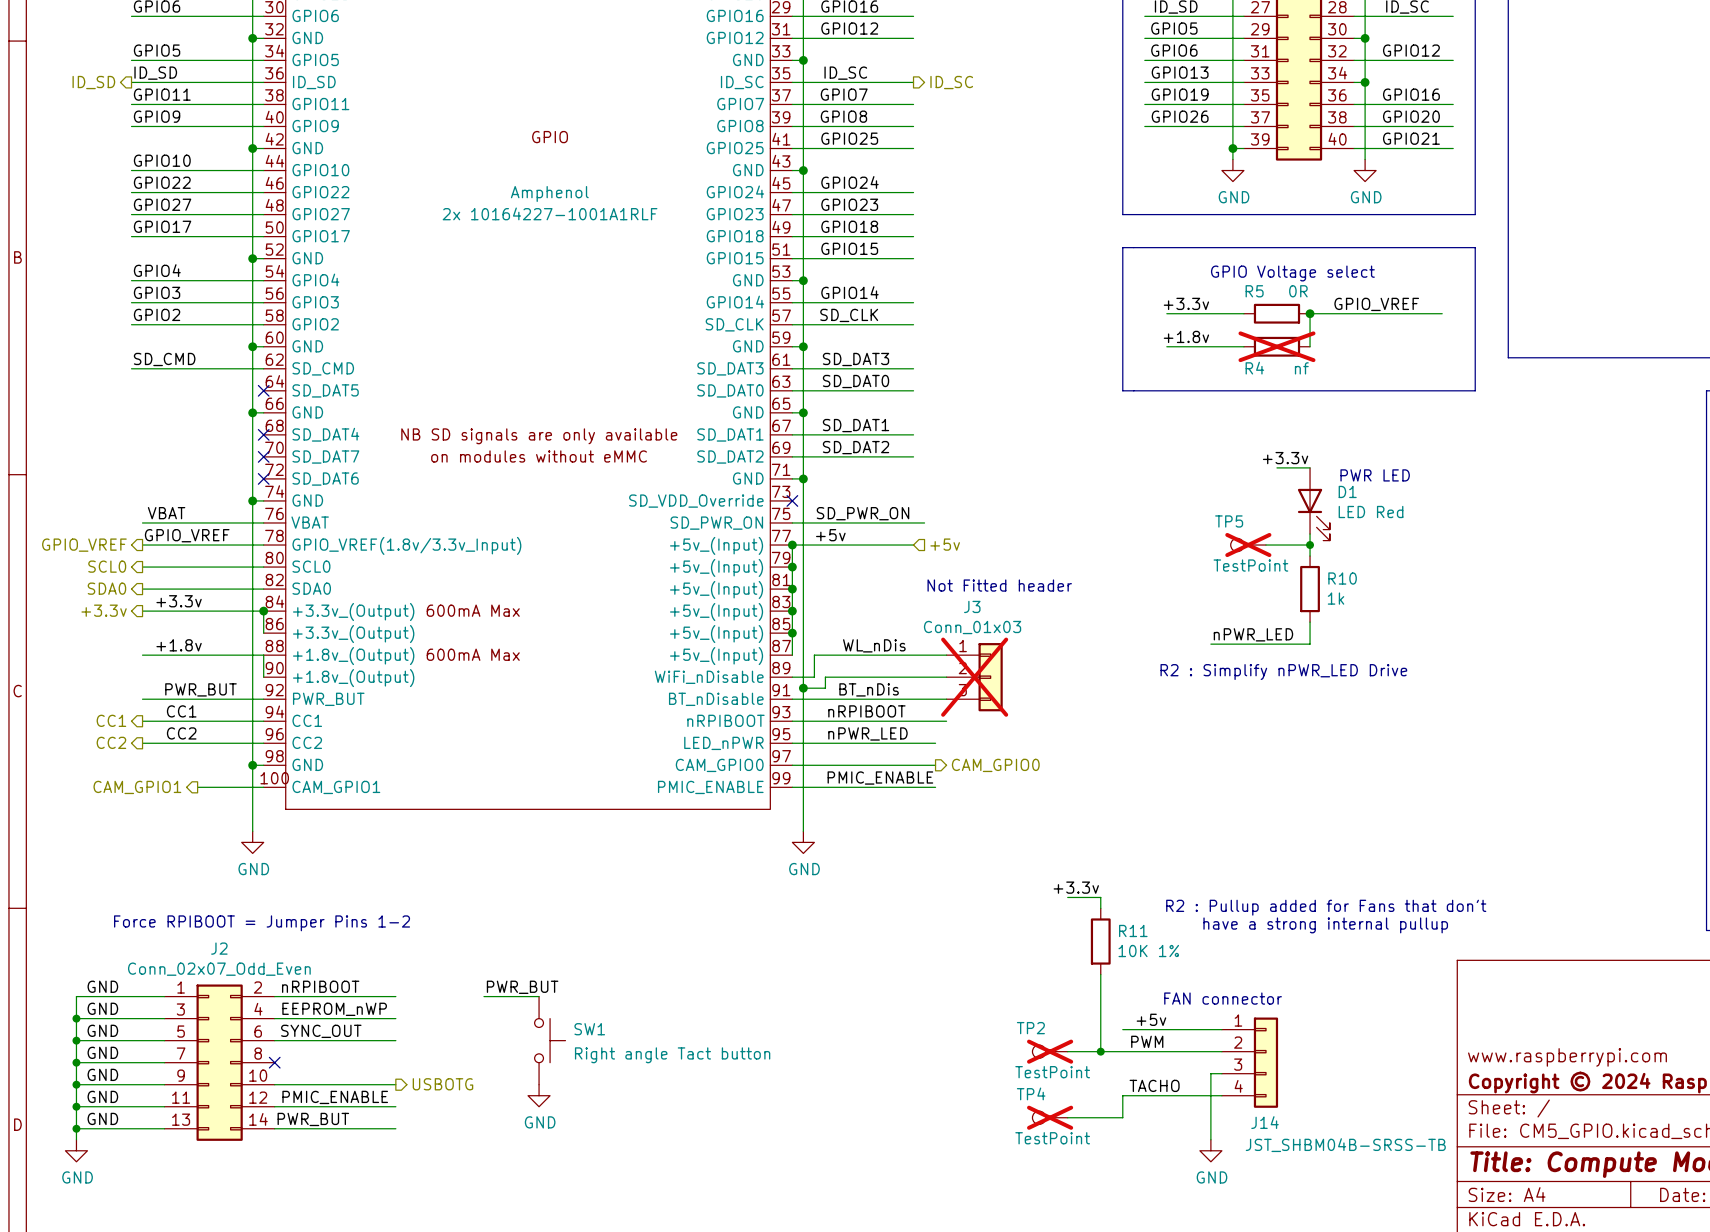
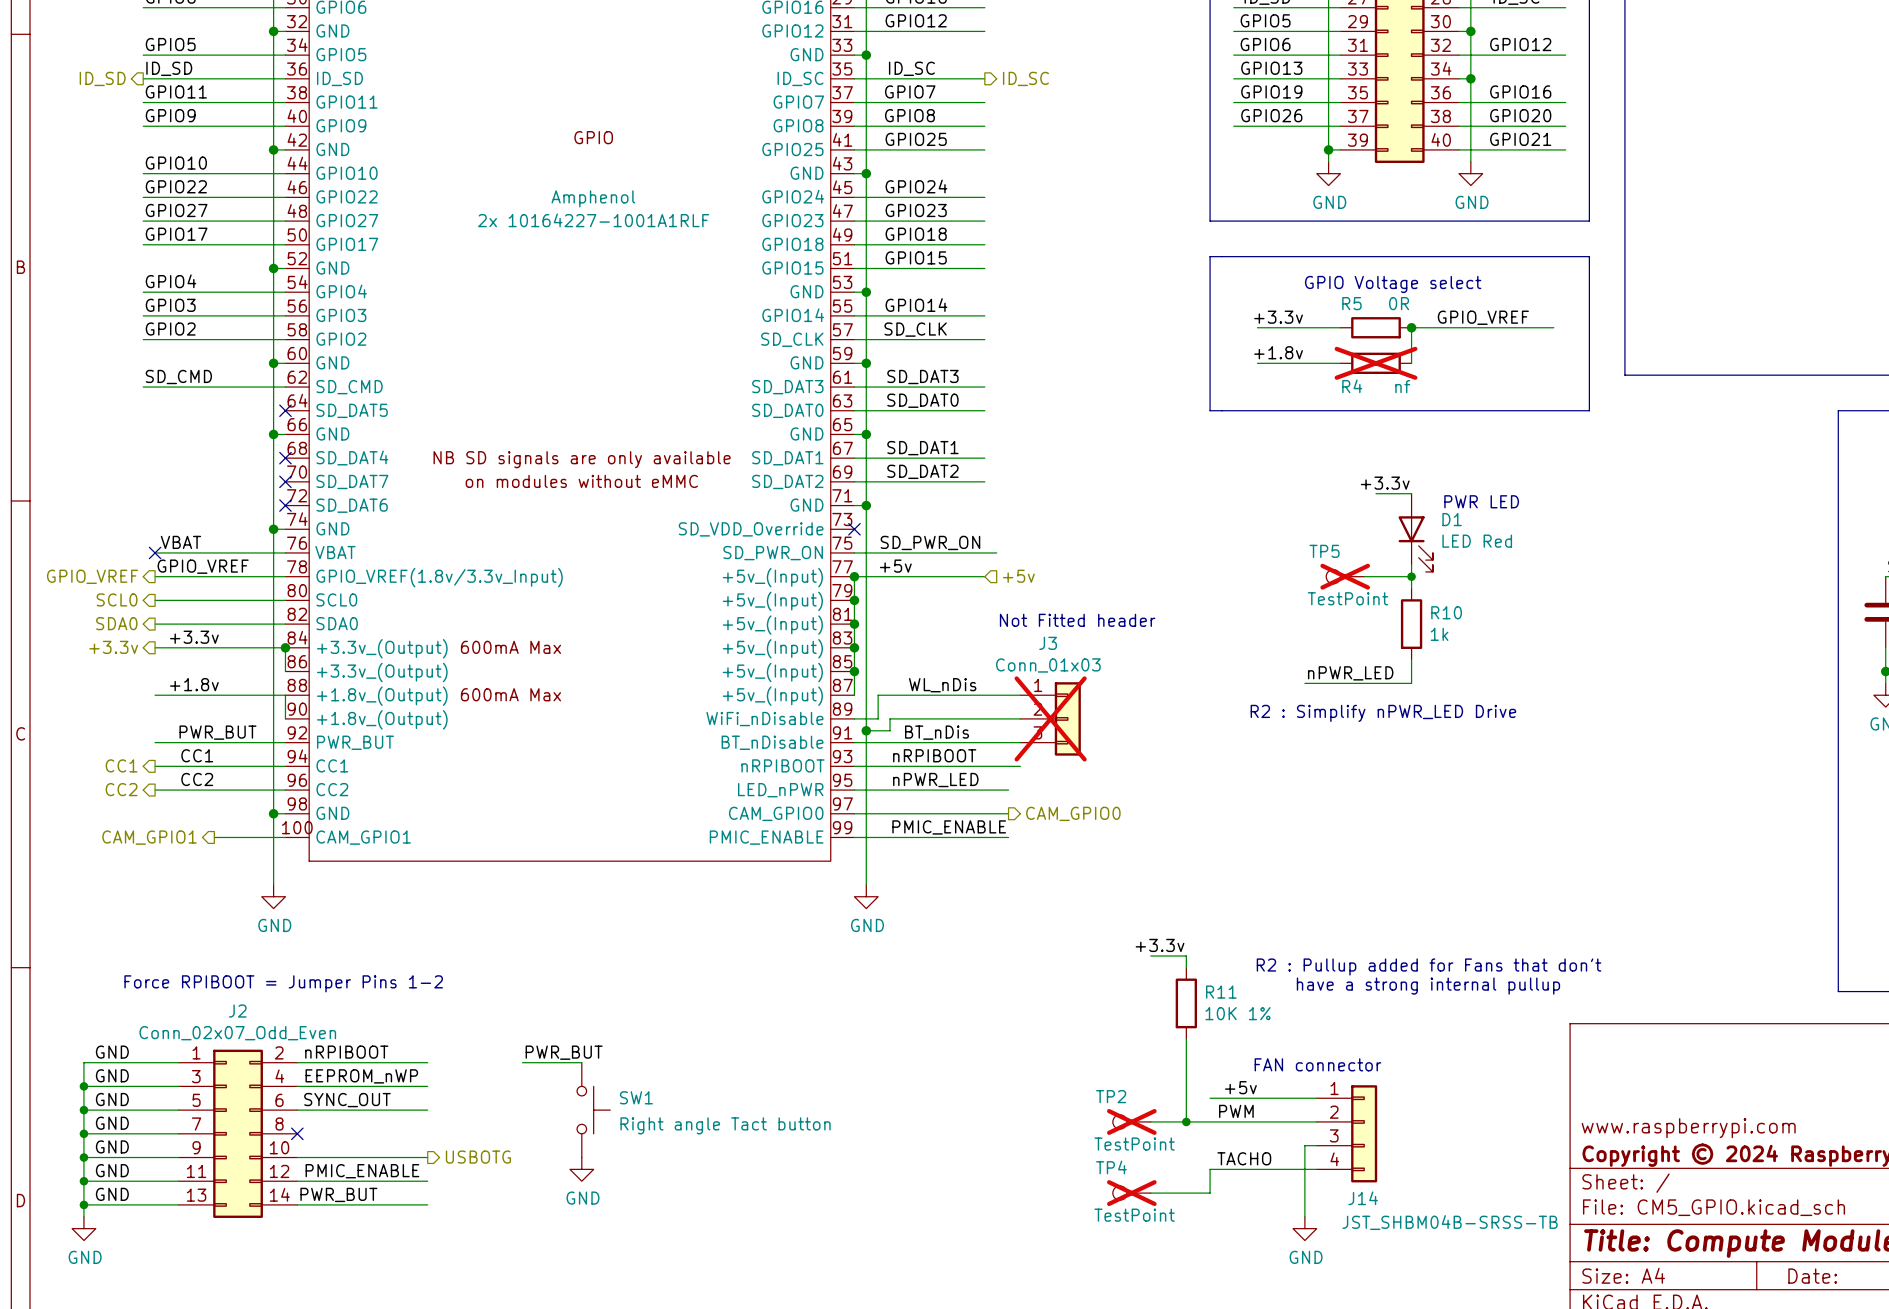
no-connect mark: none -> (155, 552)

